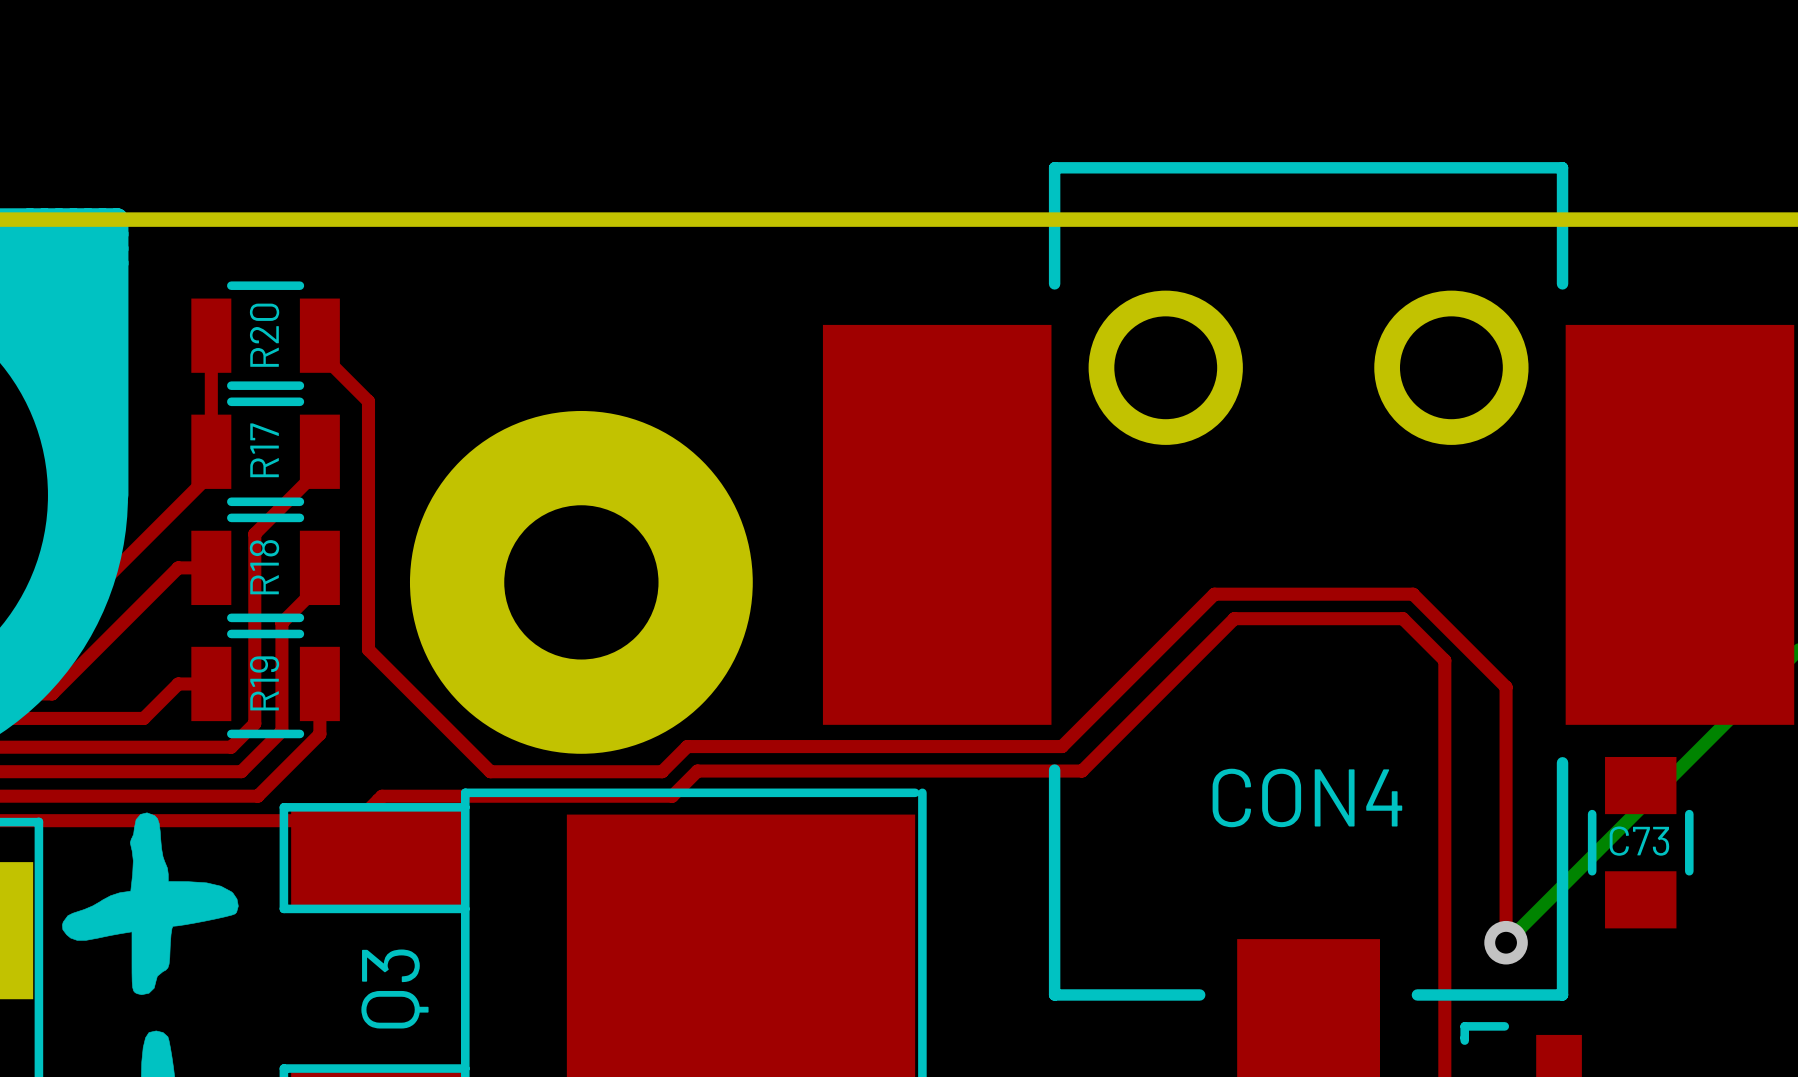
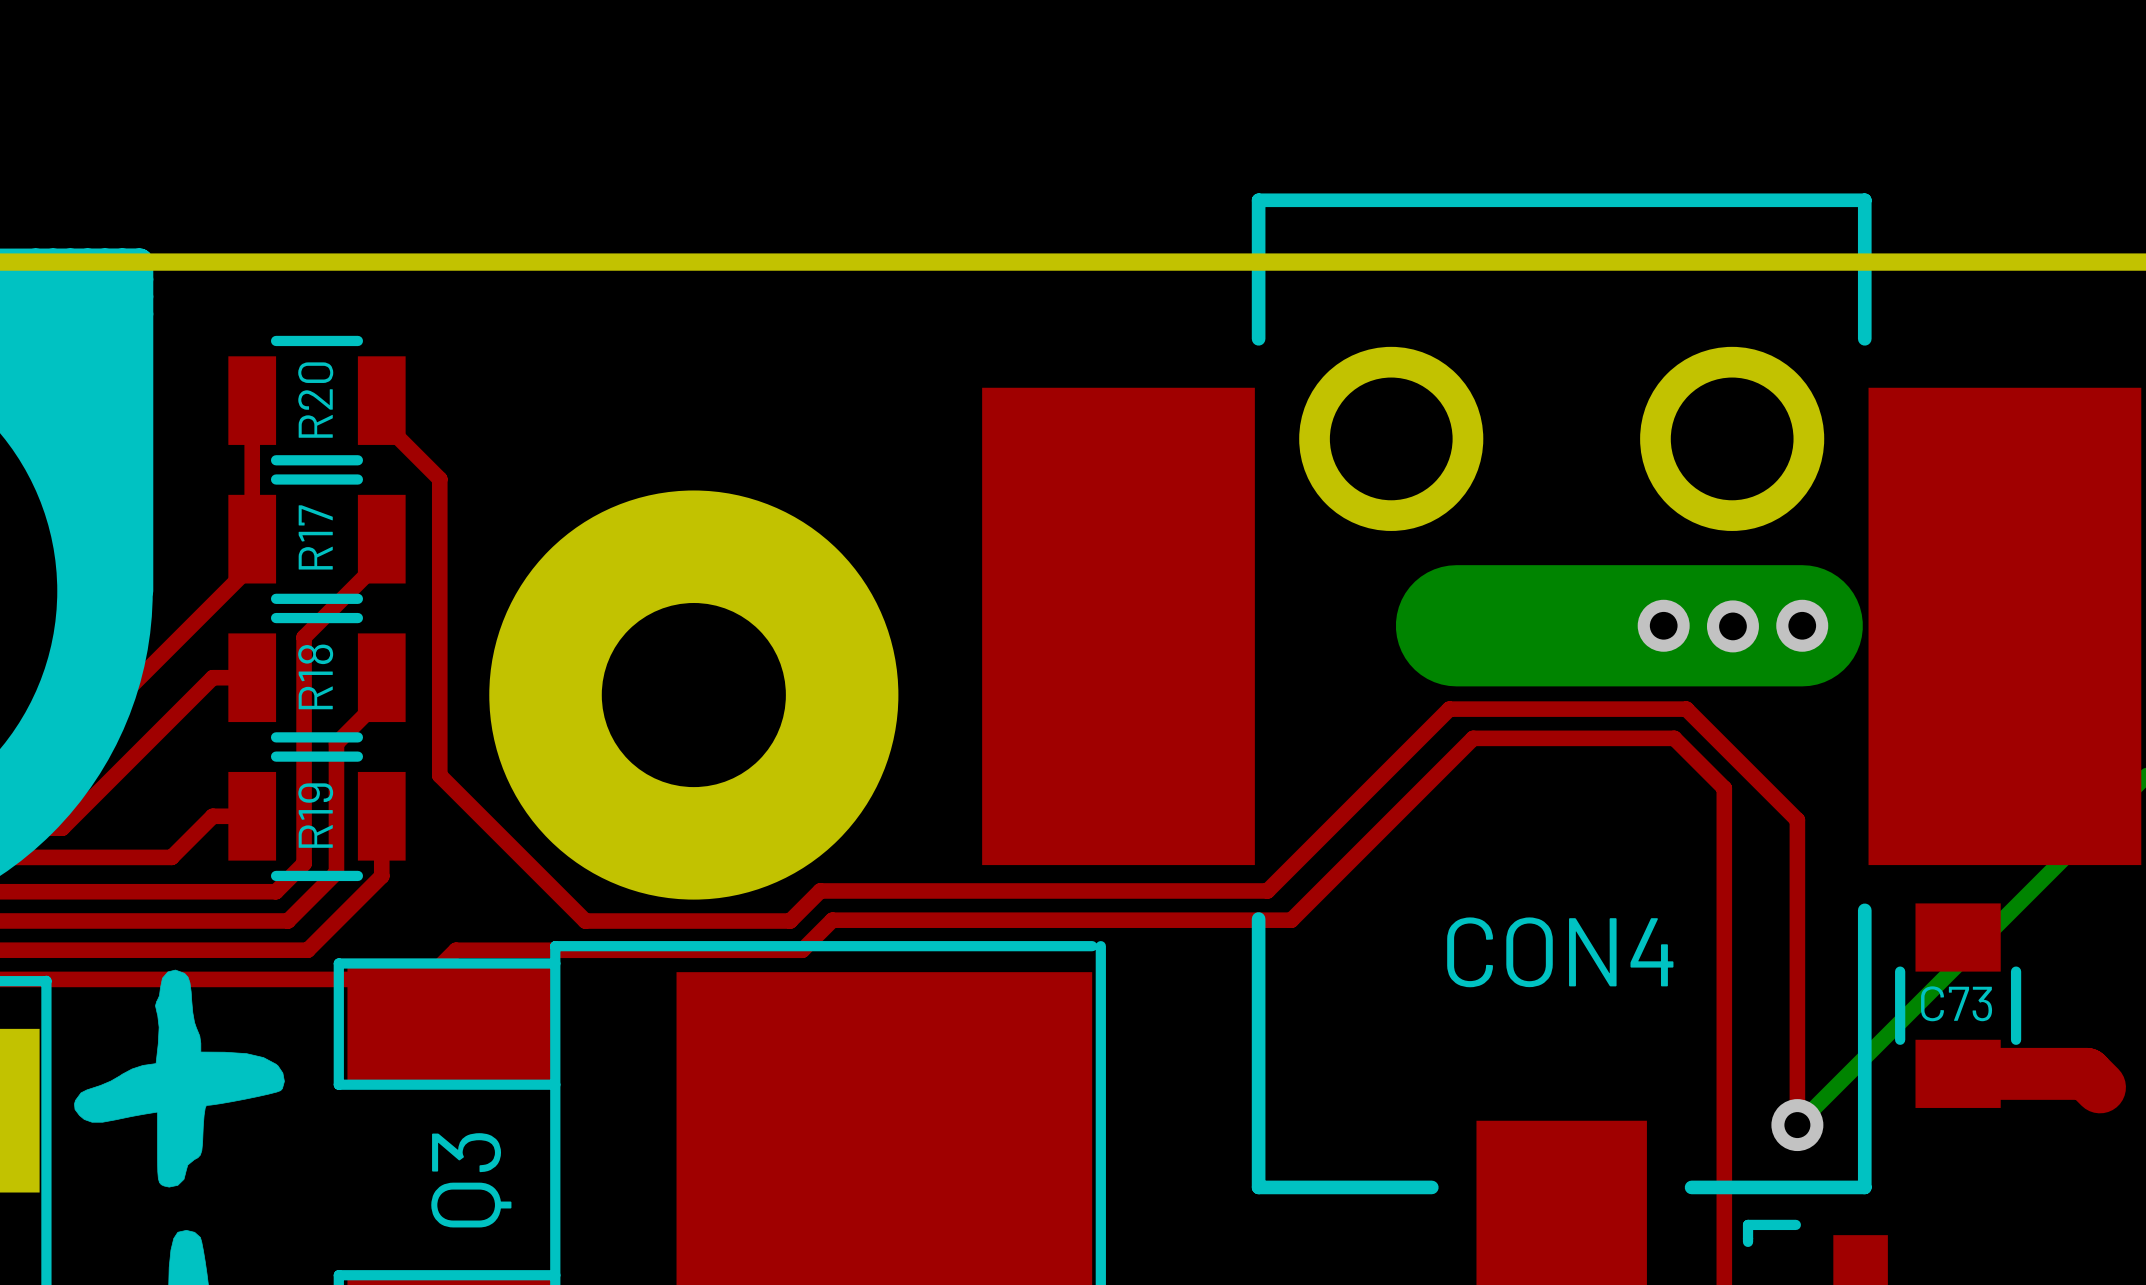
bottom track: none -> (1456, 625) (1802, 625)
via: none -> (1663, 625)
via: none -> (1732, 626)
via: none -> (1802, 625)
top track: none -> (1958, 1073) (2086, 1073) (2099, 1087)

